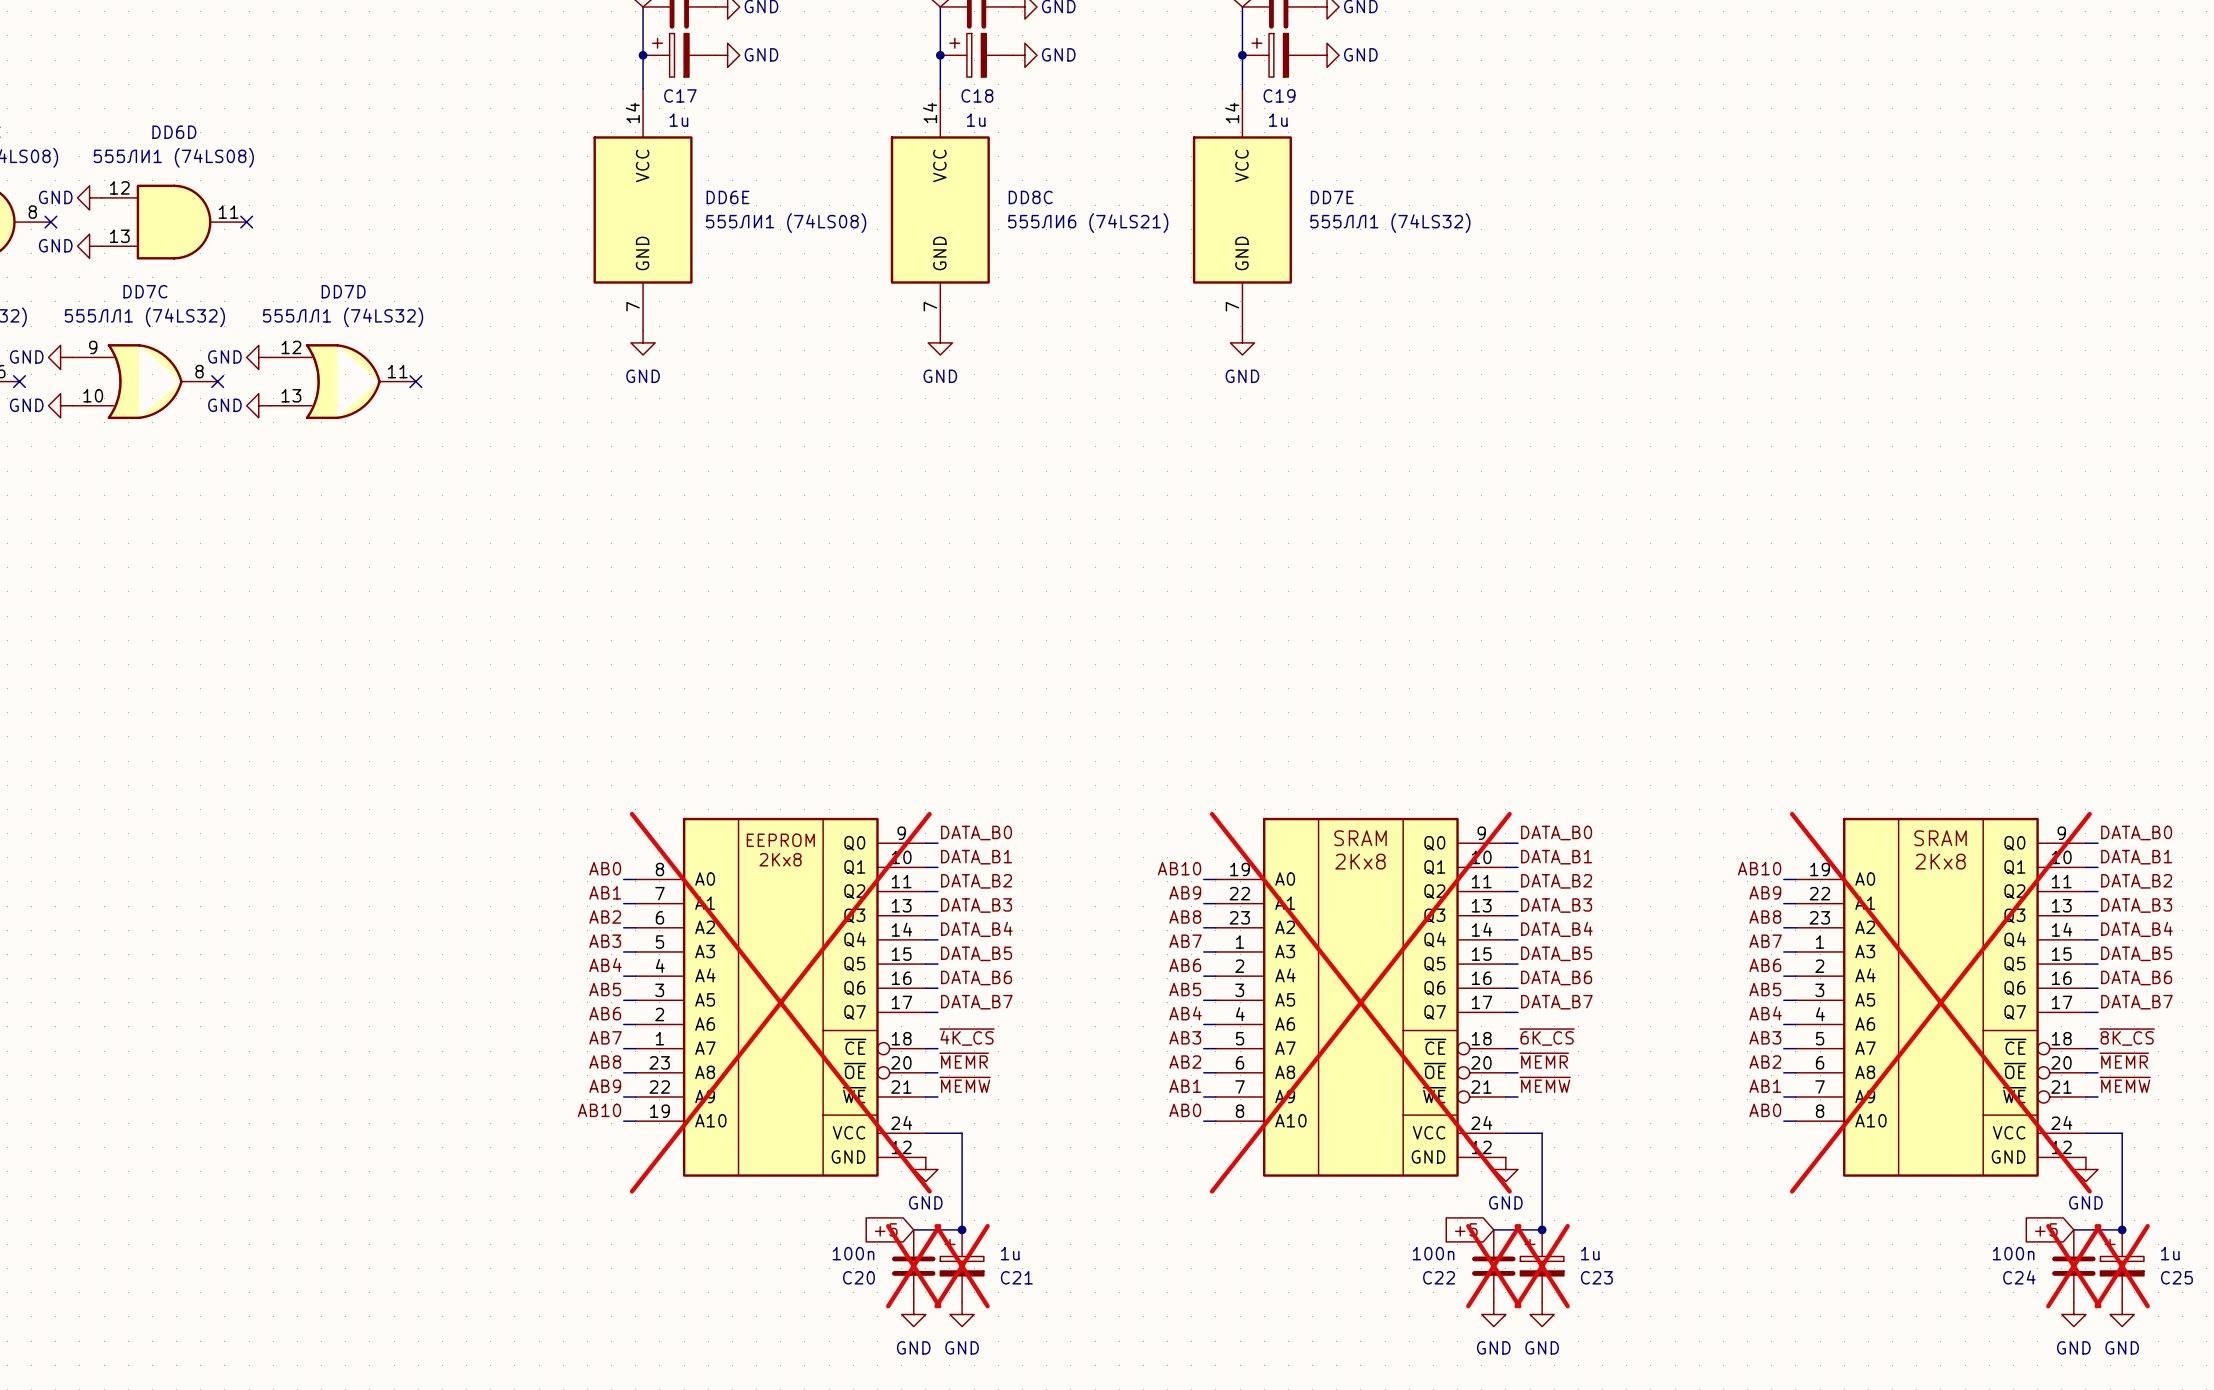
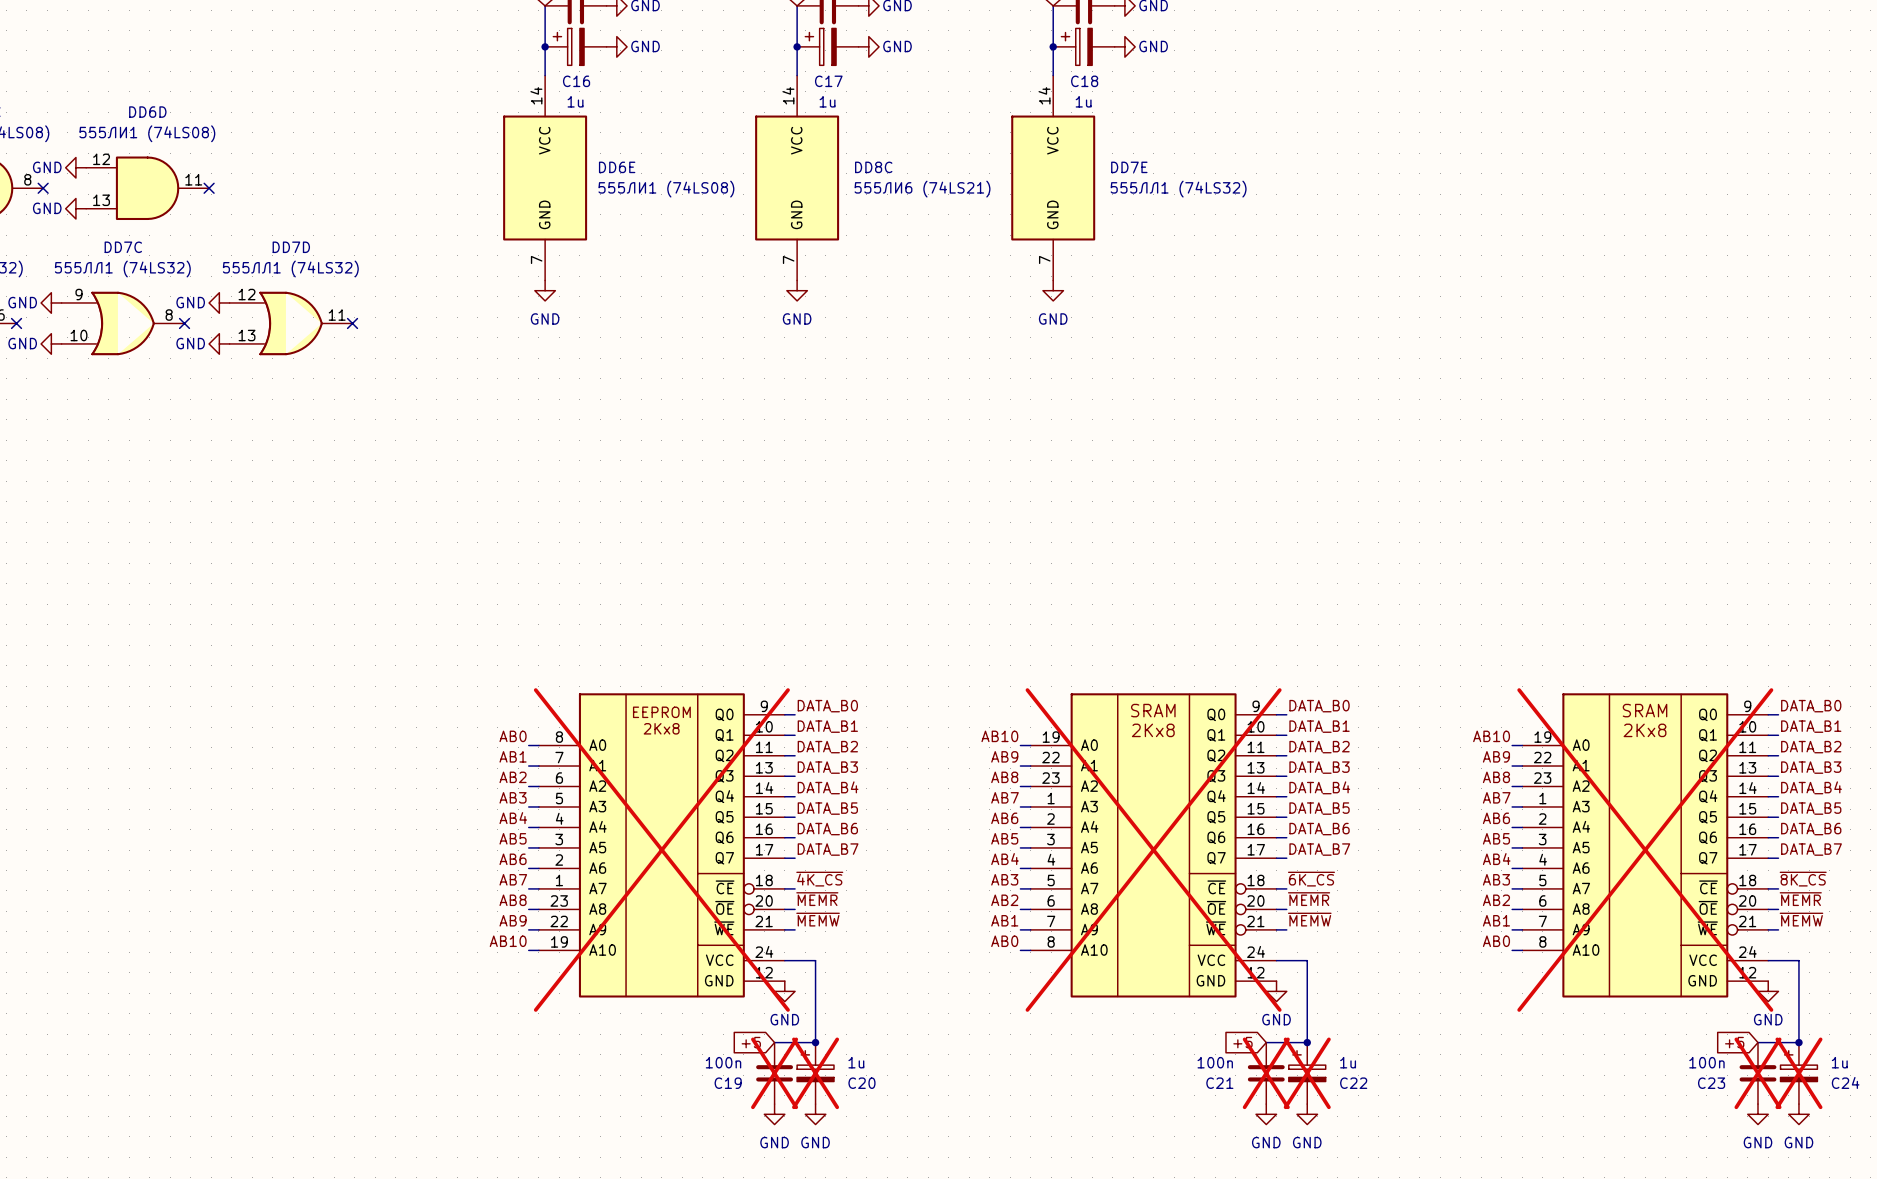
C17 name: C17 (680, 95) -> C16 (576, 81)
C18 name: C18 (977, 95) -> C17 (828, 81)
C19 name: C19 (1279, 95) -> C18 (1084, 81)
C20 name: C20 (858, 1277) -> C19 (728, 1083)
C21 name: C21 (1016, 1277) -> C20 (861, 1083)
C22 name: C22 (1439, 1277) -> C21 (1219, 1083)
C23 name: C23 (1596, 1277) -> C22 (1353, 1083)
C24 name: C24 (2019, 1277) -> C23 (1711, 1083)
C25 name: C25 (2176, 1277) -> C24 (1845, 1082)

